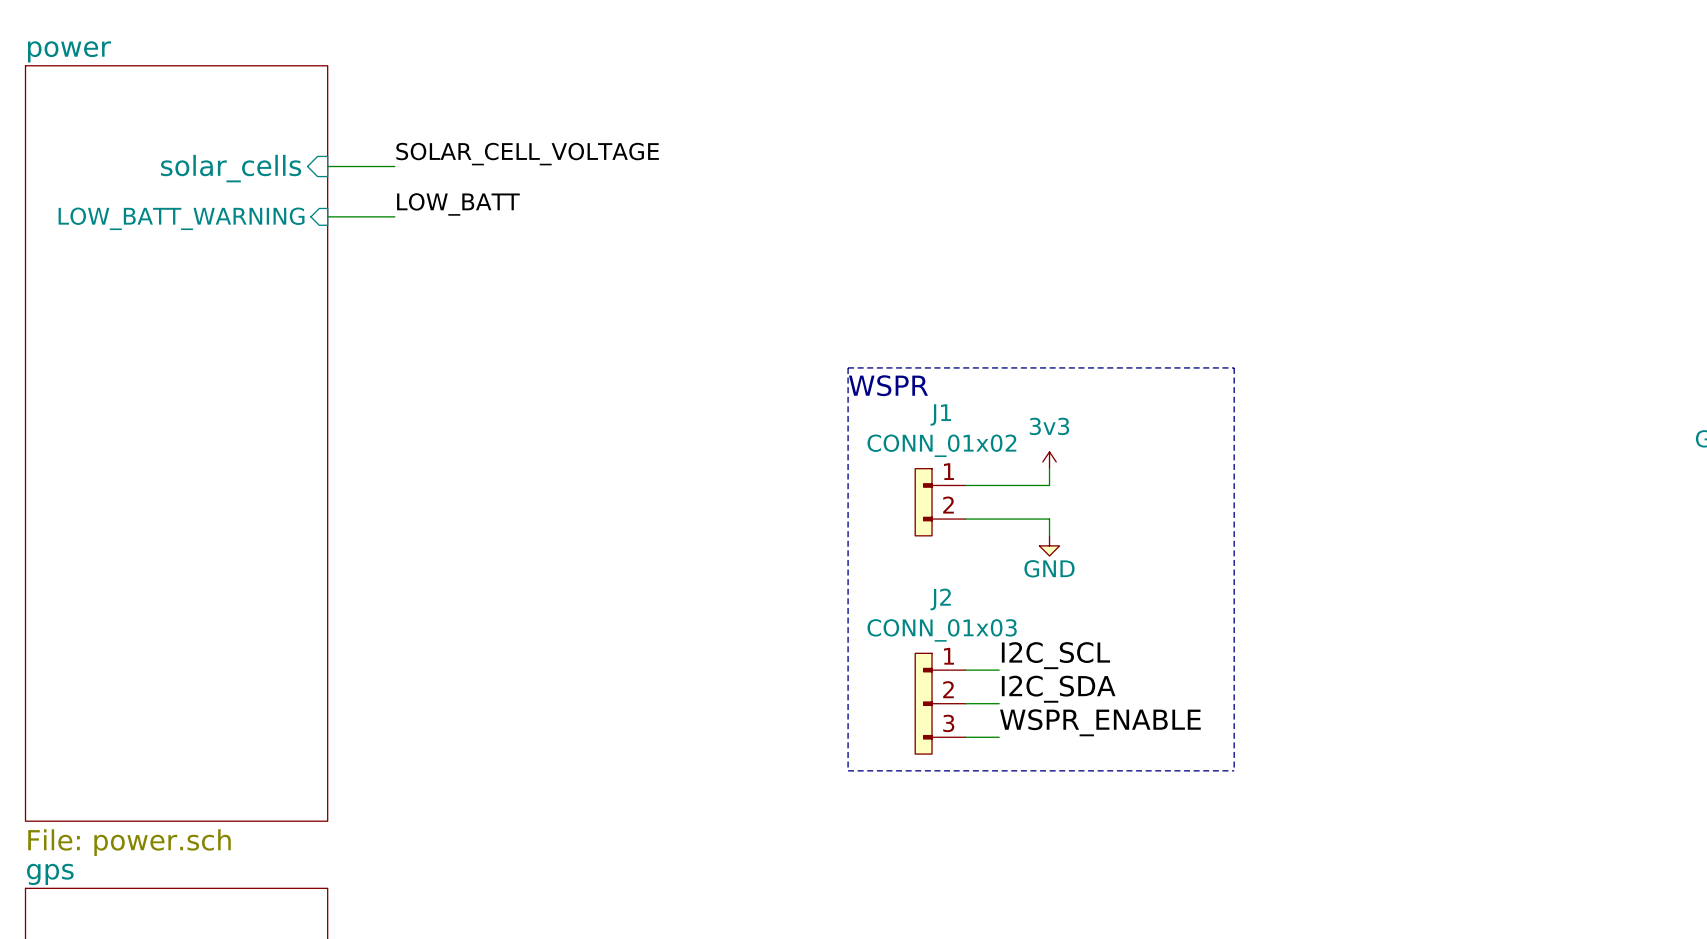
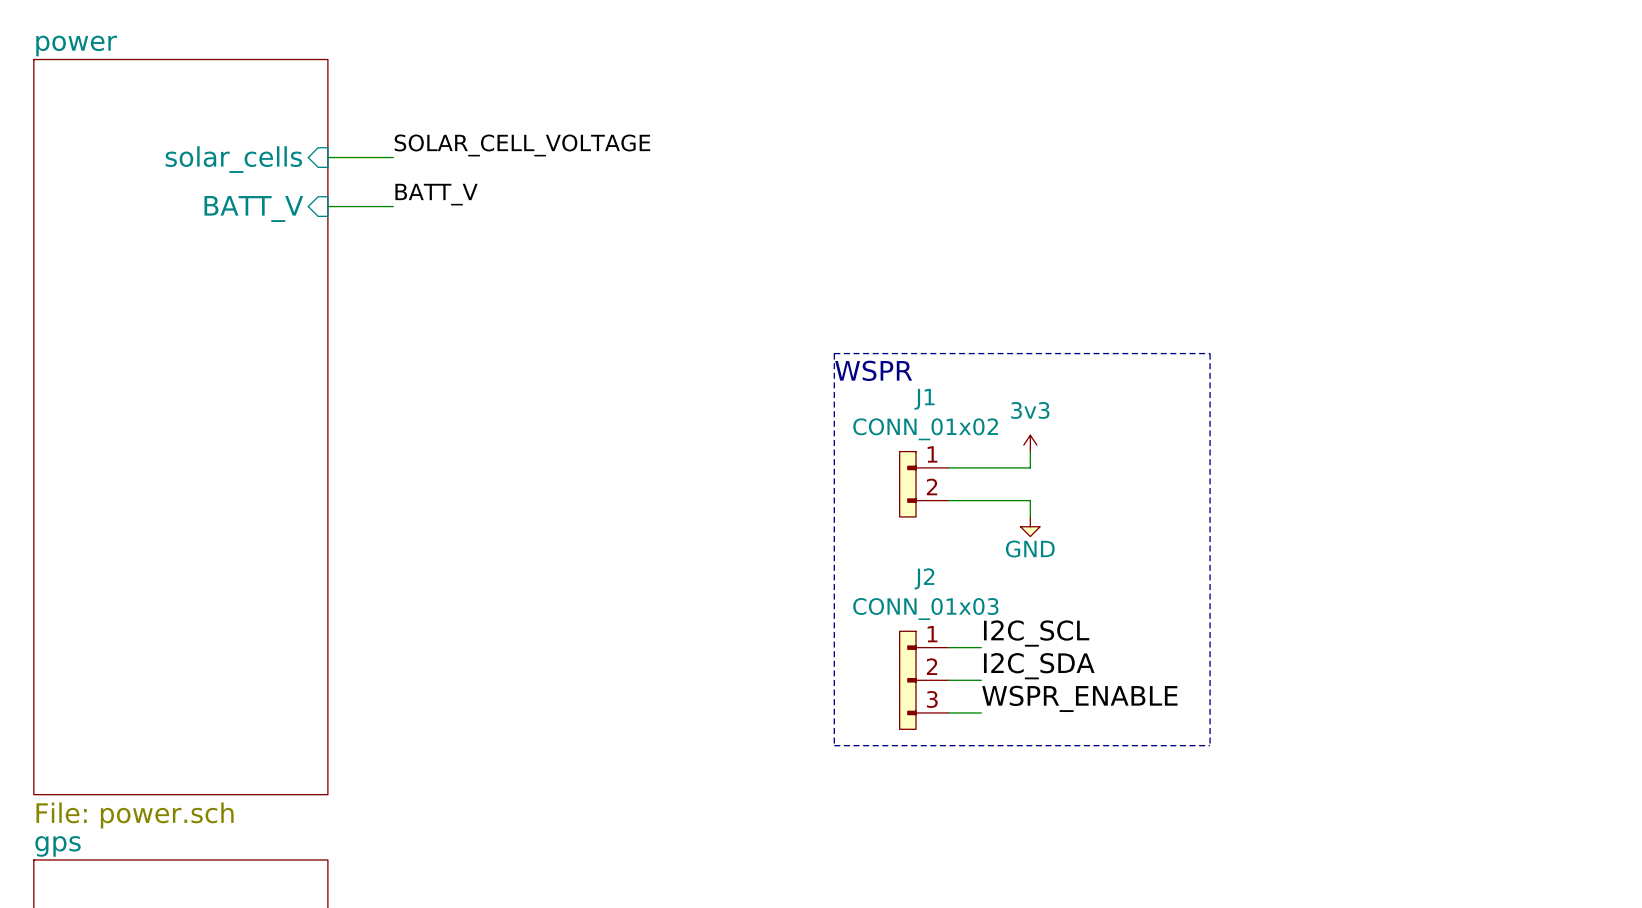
label: LOW_BATT (458, 204) -> BATT_V (436, 194)
sheet pin: LOW_BATT_WARNING (181, 218) -> BATT_V (253, 208)

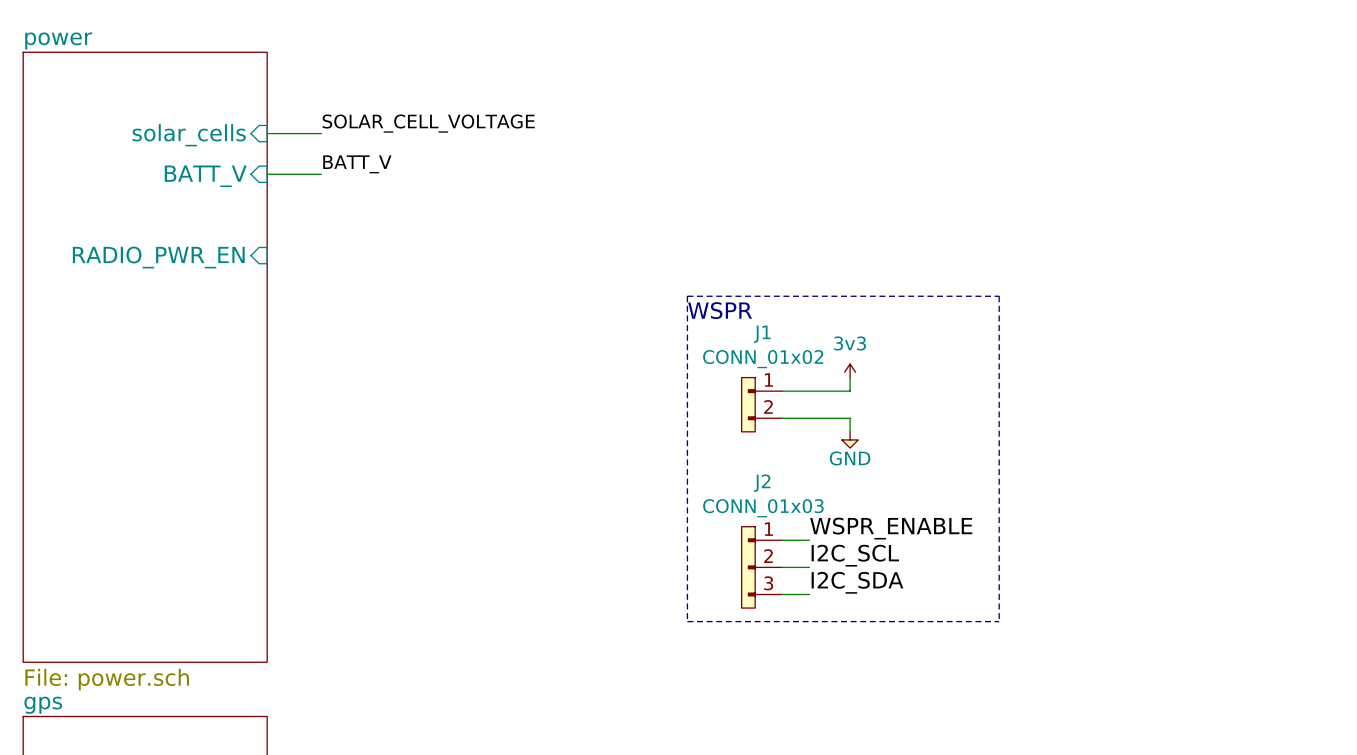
sheet pin: none -> RADIO_PWR_EN (158, 257)
label: I2C_SCL (1036, 633) -> WSPR_ENABLE (891, 528)
label: I2C_SDA (1039, 666) -> I2C_SCL (855, 555)
label: WSPR_ENABLE (1079, 698) -> I2C_SDA (857, 582)

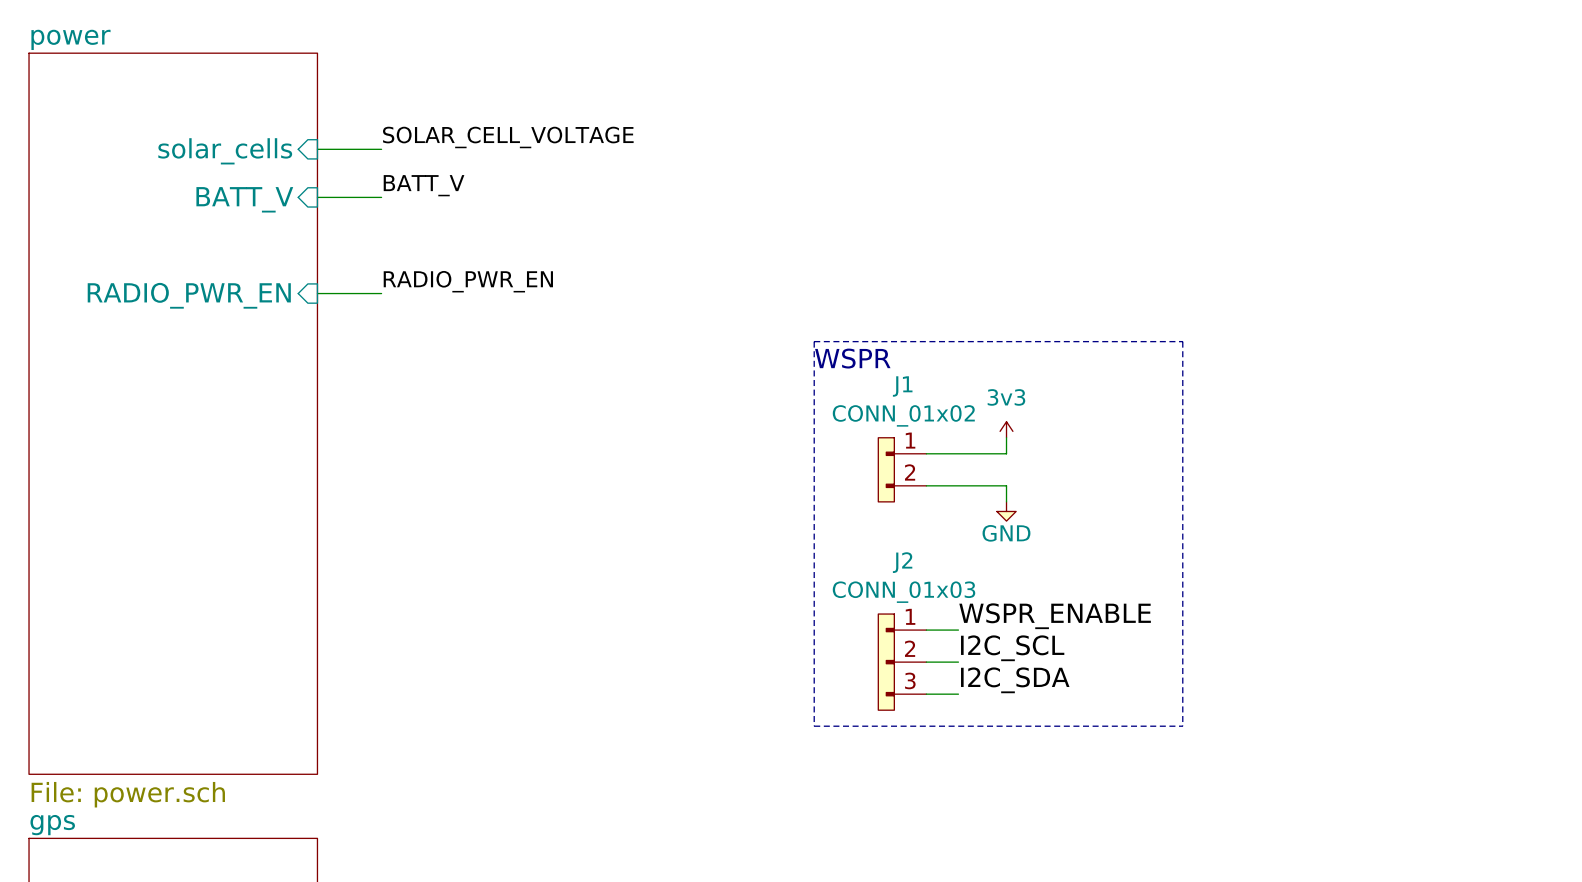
label: none -> RADIO_PWR_EN (468, 281)
wire: none -> (317, 293) (381, 293)

